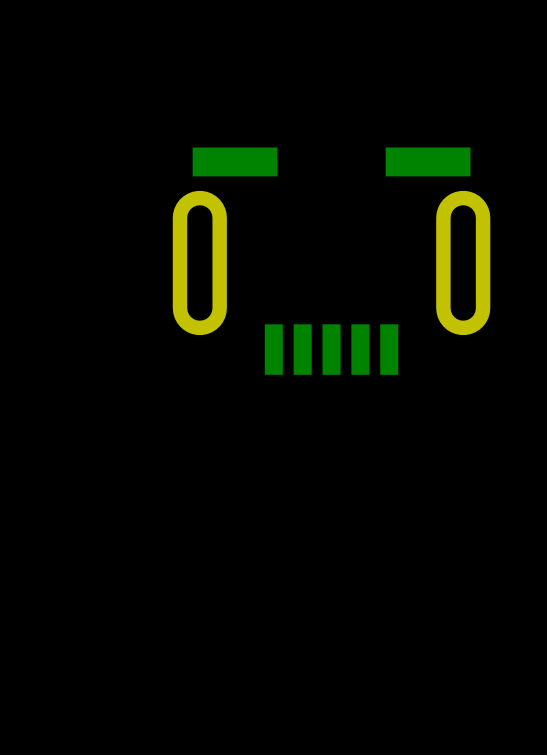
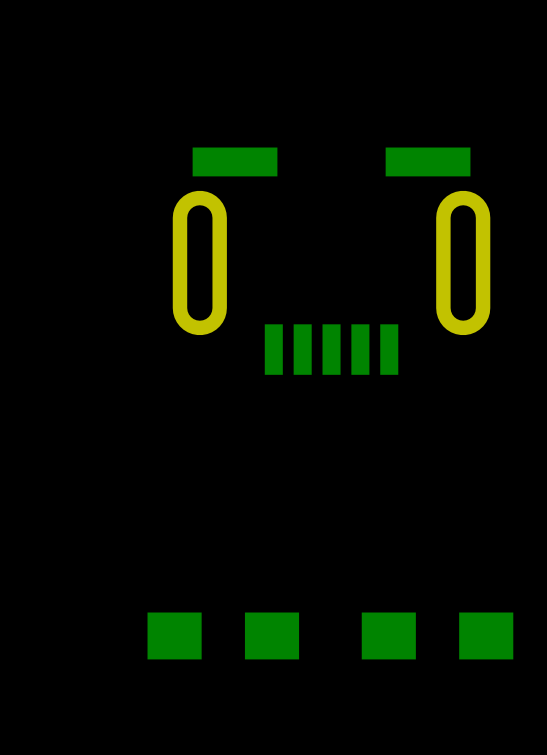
part: none -> (223, 635)
part: none -> (437, 635)

